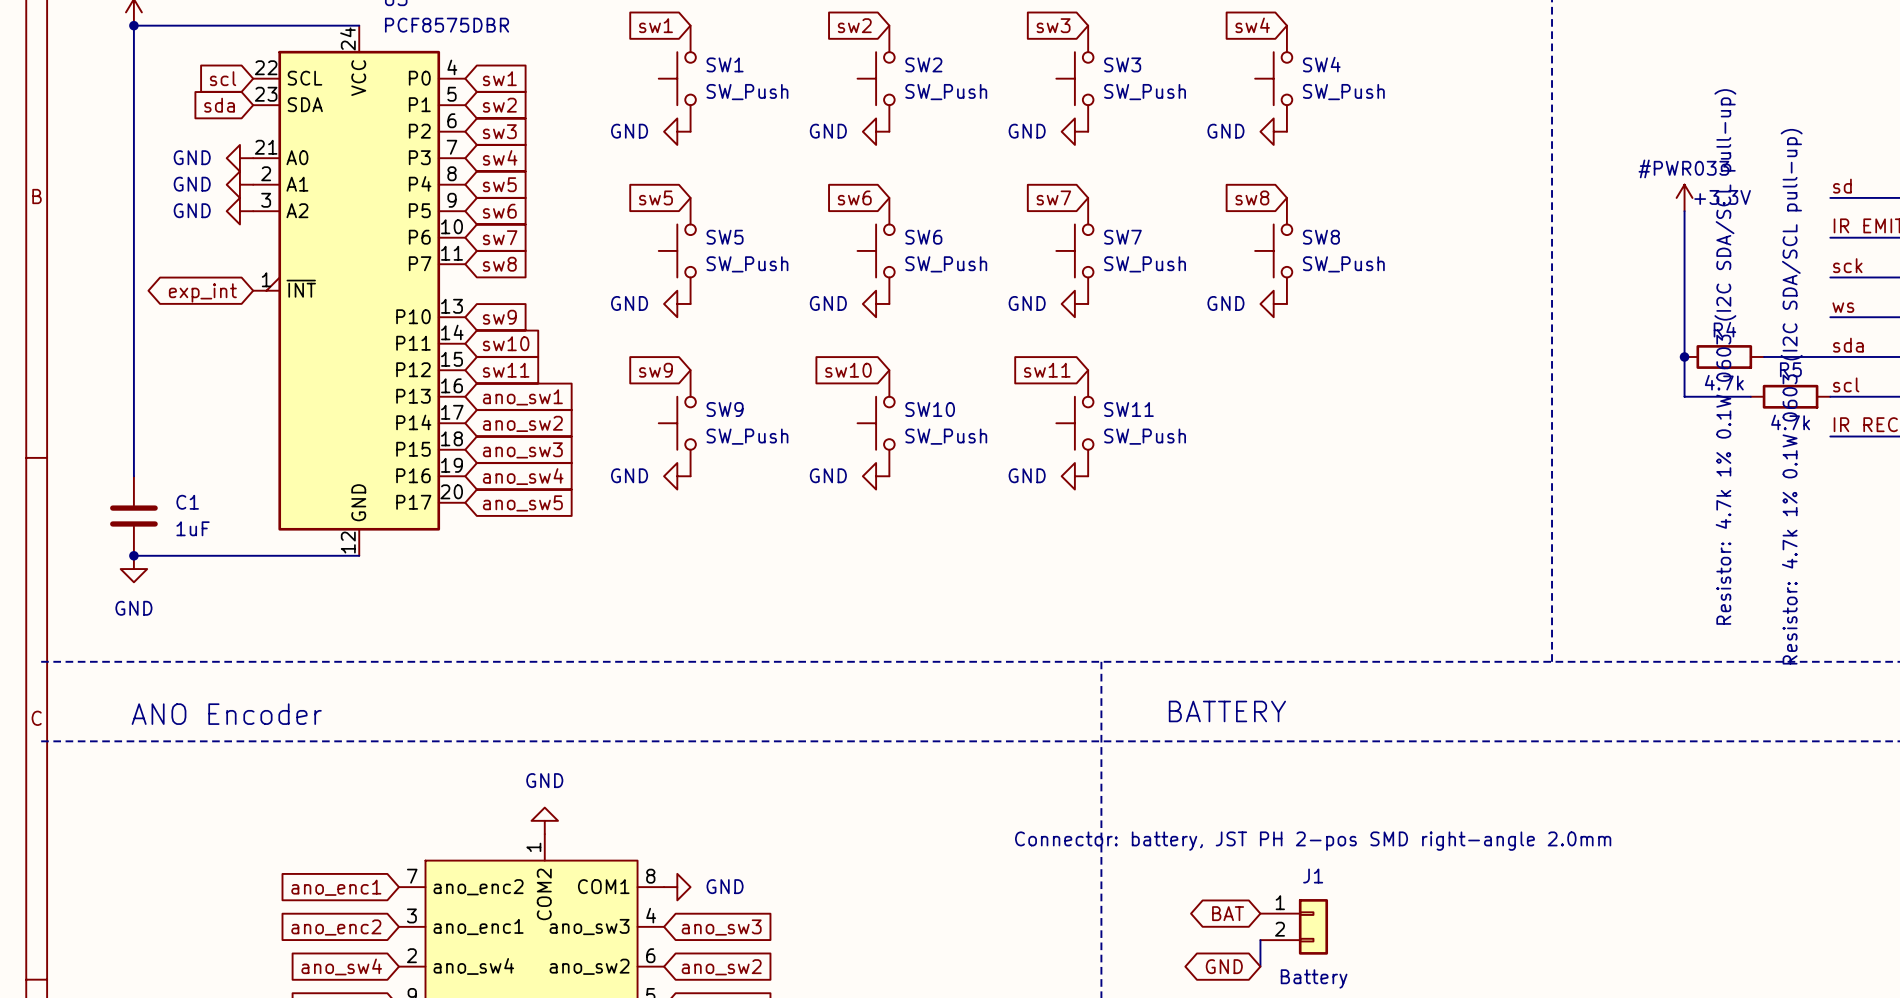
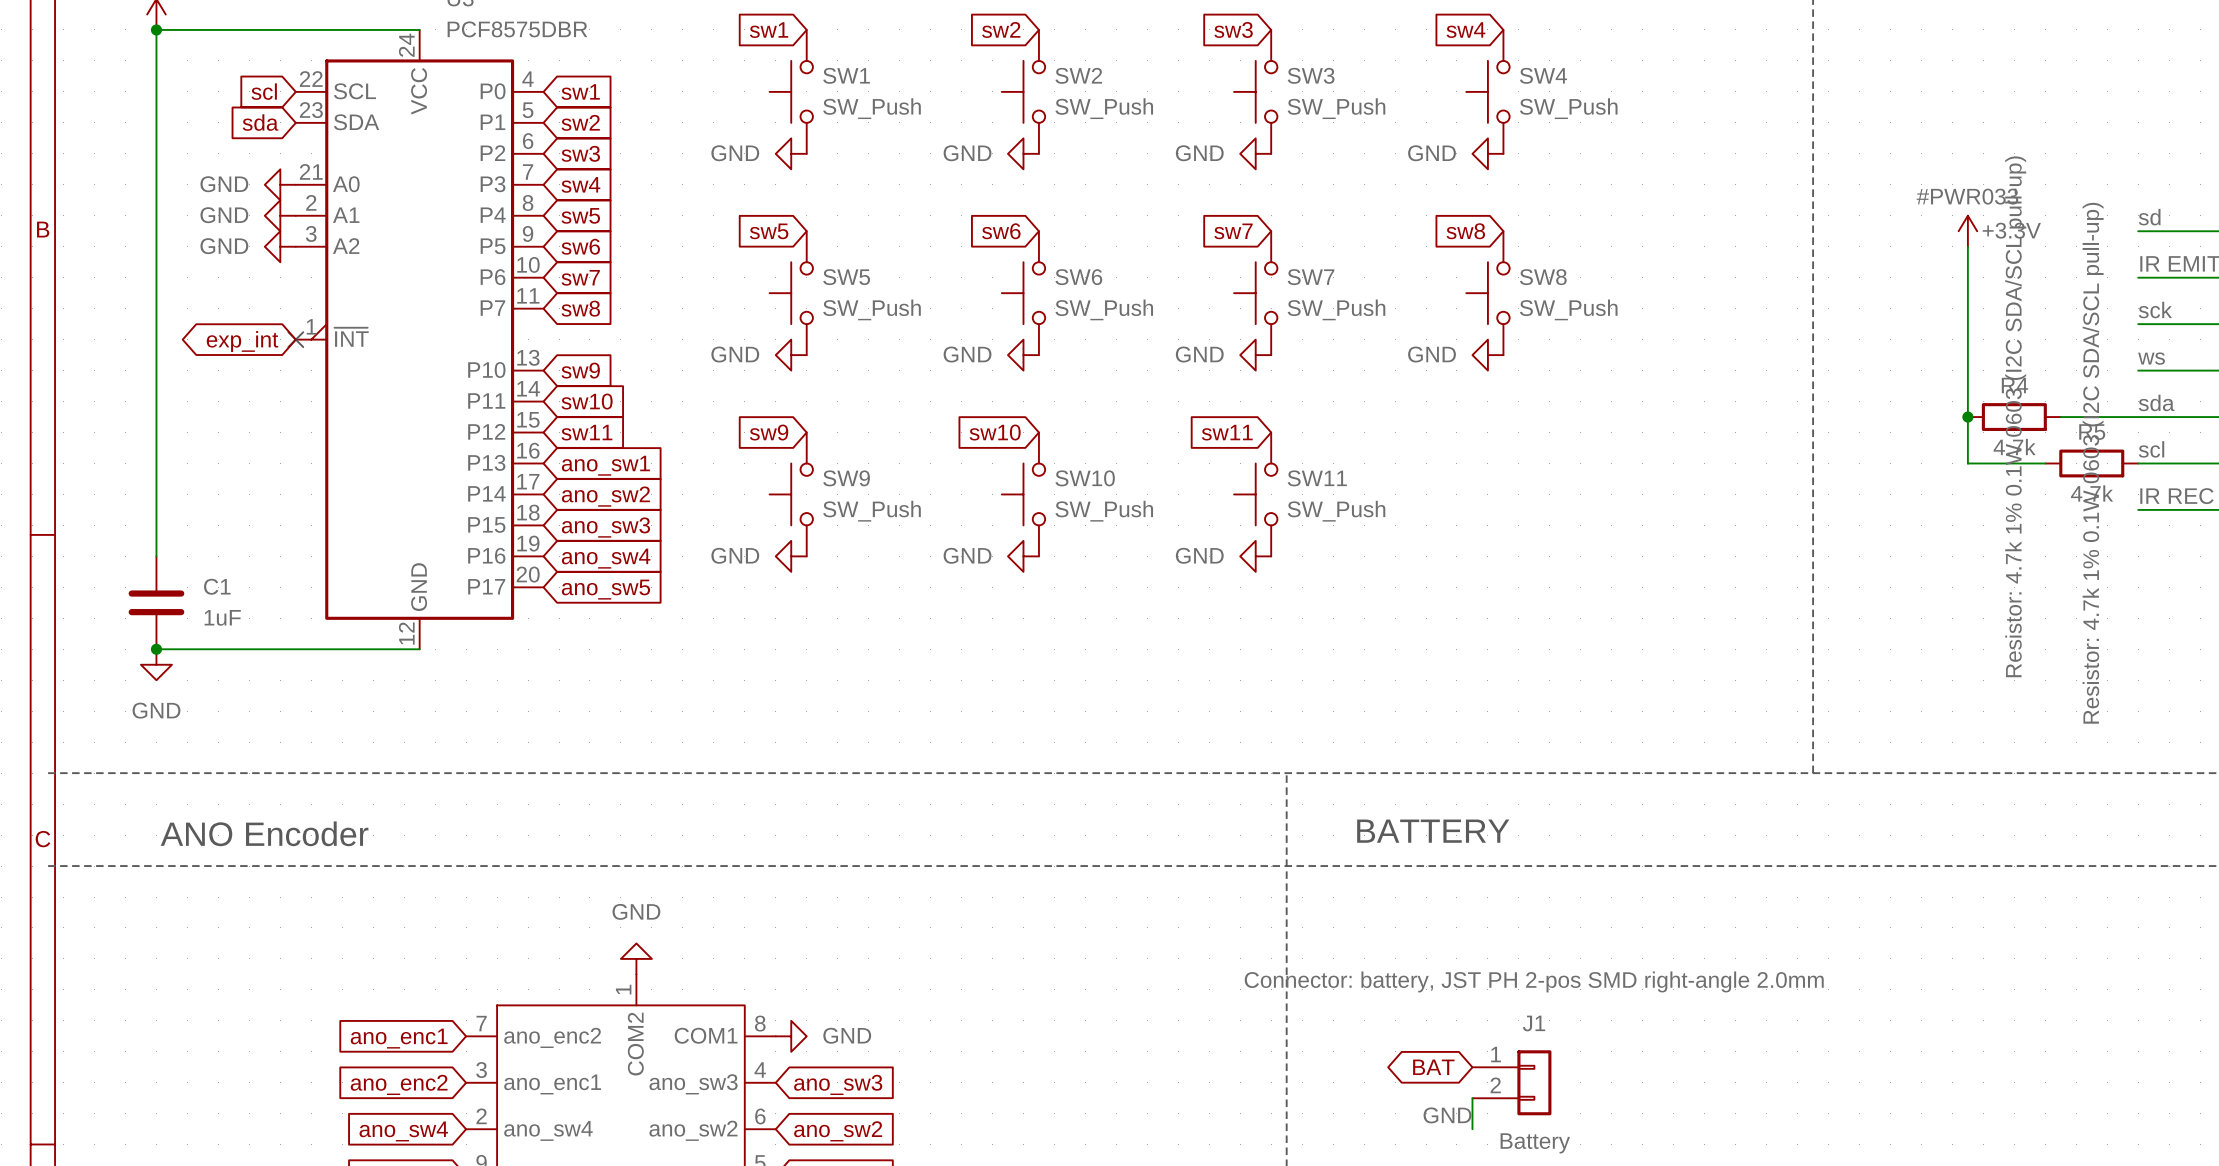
no-connect mark: none -> (295, 339)
label: none -> GND (1447, 1115)
global label: GND (1224, 966) -> none

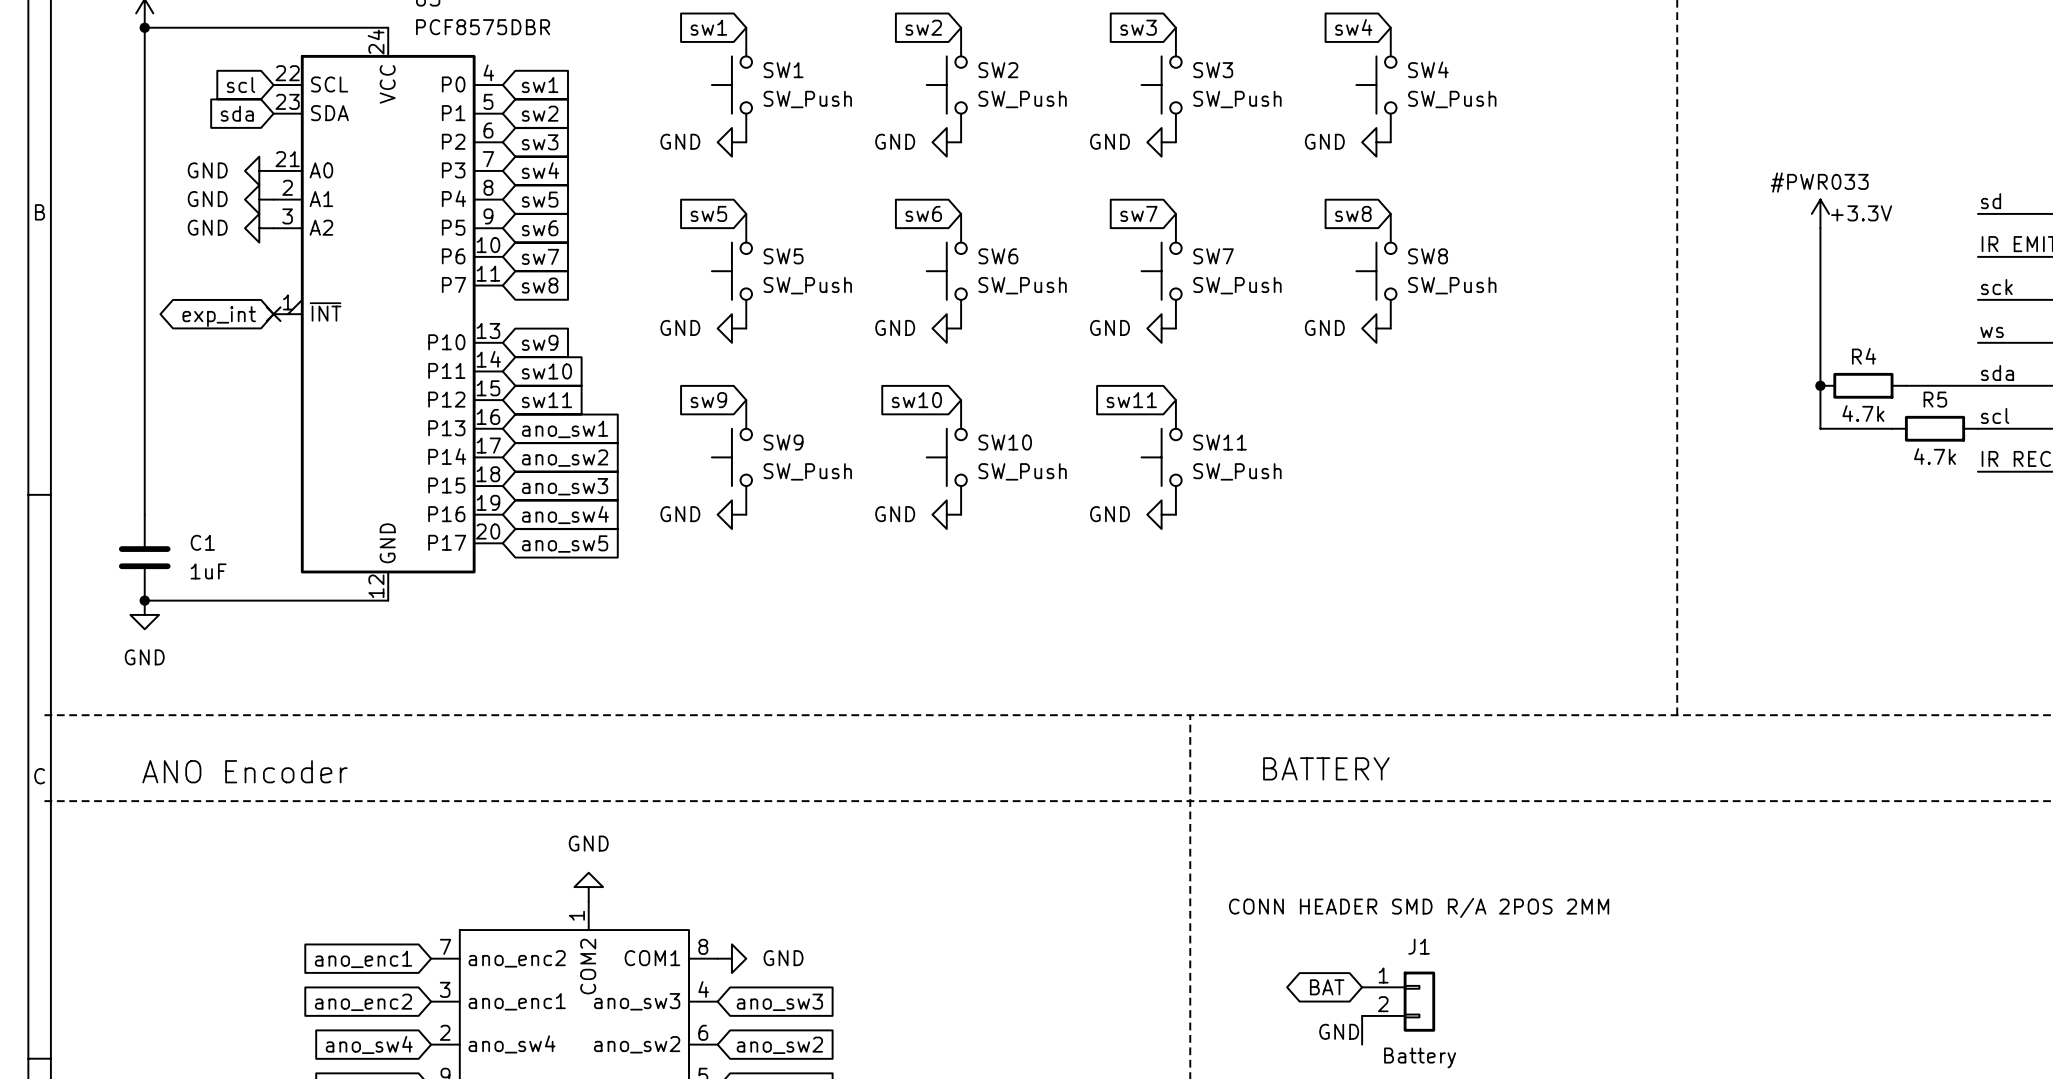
R4 text: Resistor: 4.7k 1% 0.1W 0603 (I2C SDA/SCL pull-up) (2015, 416) -> none
R5 text: Resistor: 4.7k 1% 0.1W 0603 (I2C SDA/SCL pull-up) (2093, 463) -> none
J1 text: Connector: battery, JST PH 2-pos SMD right-angle 2.0mm (1534, 981) -> CONN HEADER SMD R/A 2POS 2MM (1419, 907)

